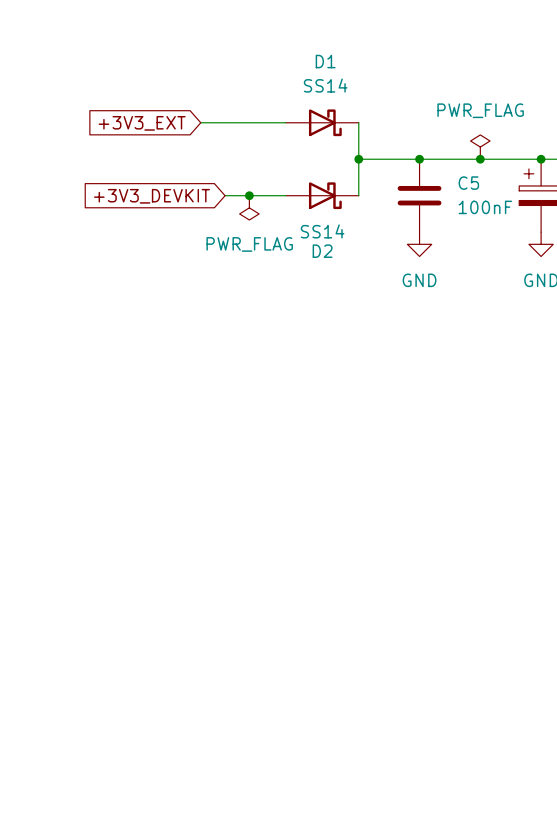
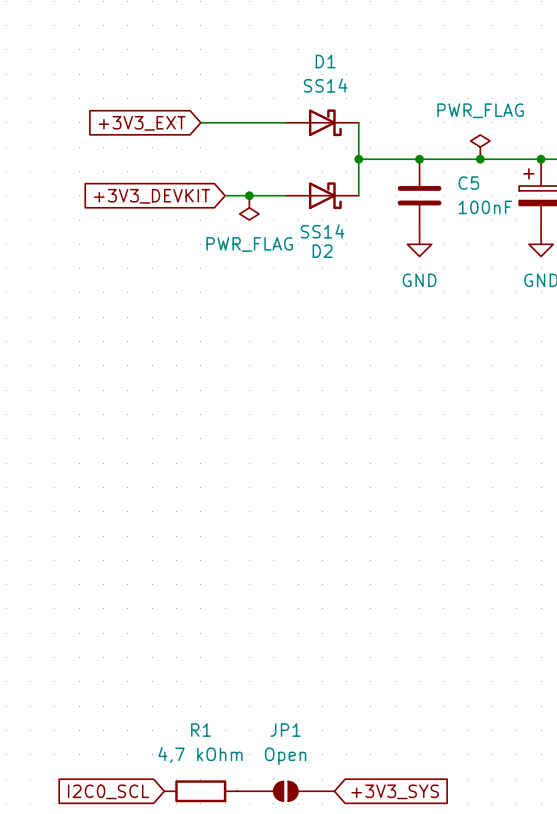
global label: none -> I2C0_SCL (108, 791)
R1: none -> 4,7 kOhm (200, 791)
JP1: none -> Open (285, 791)
global label: none -> +3V3_SYS (395, 791)

